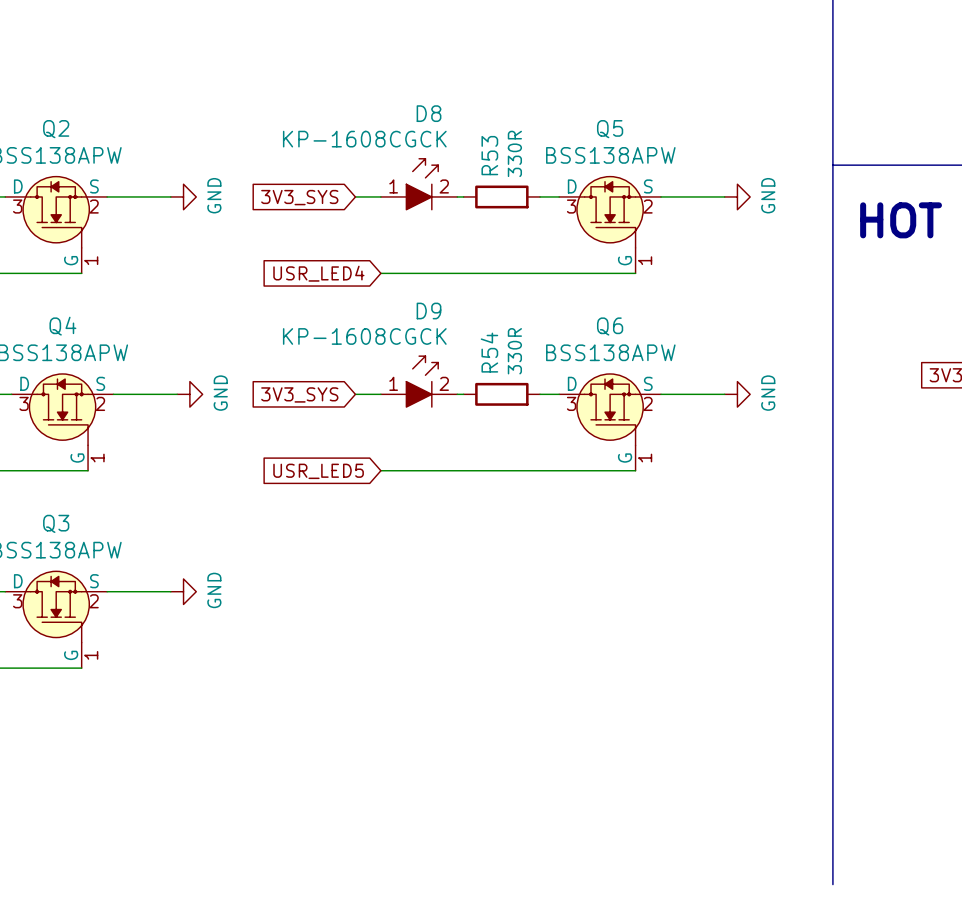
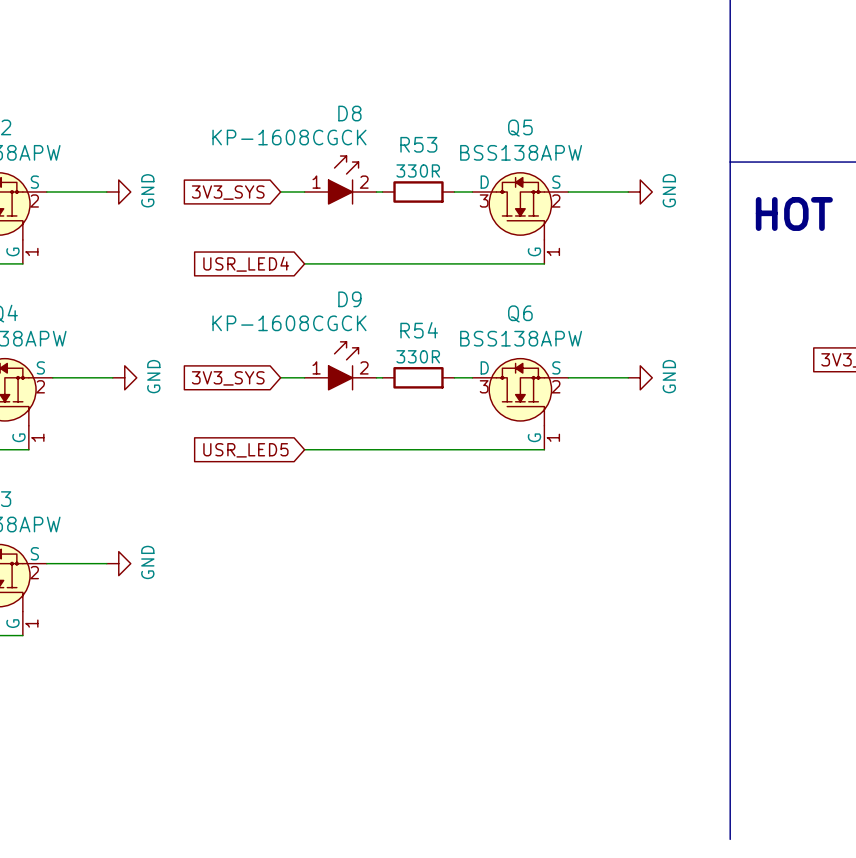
R53 text rotation: 0° (514, 153) -> 90° clockwise (418, 170)
R53 name rotation: 0° (489, 155) -> 90° clockwise (418, 144)
R54 text rotation: 0° (514, 351) -> 90° clockwise (418, 356)
R54 name rotation: 0° (489, 352) -> 90° clockwise (419, 330)

